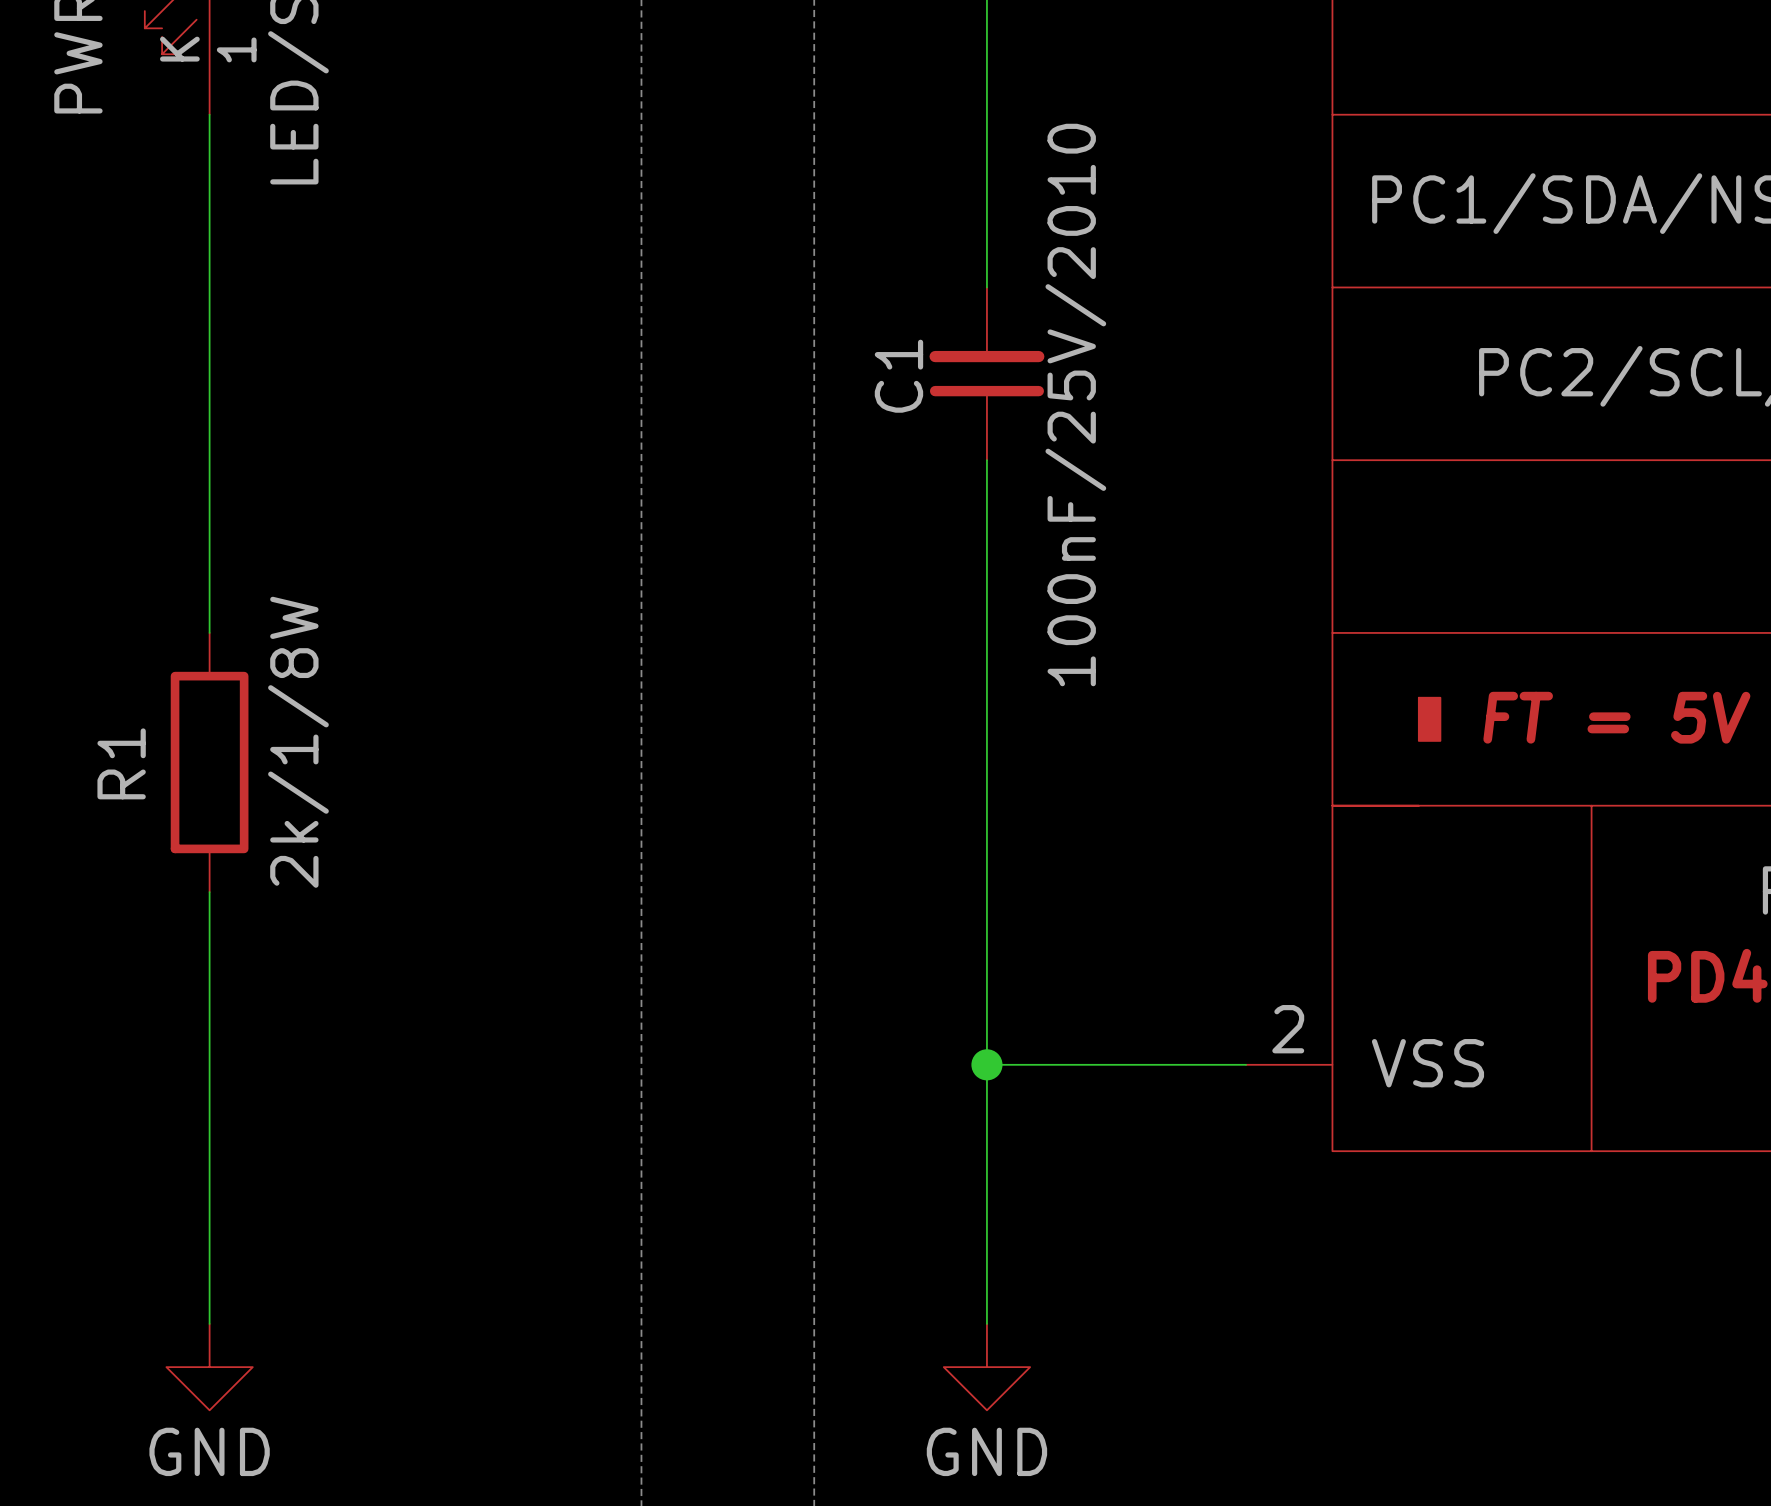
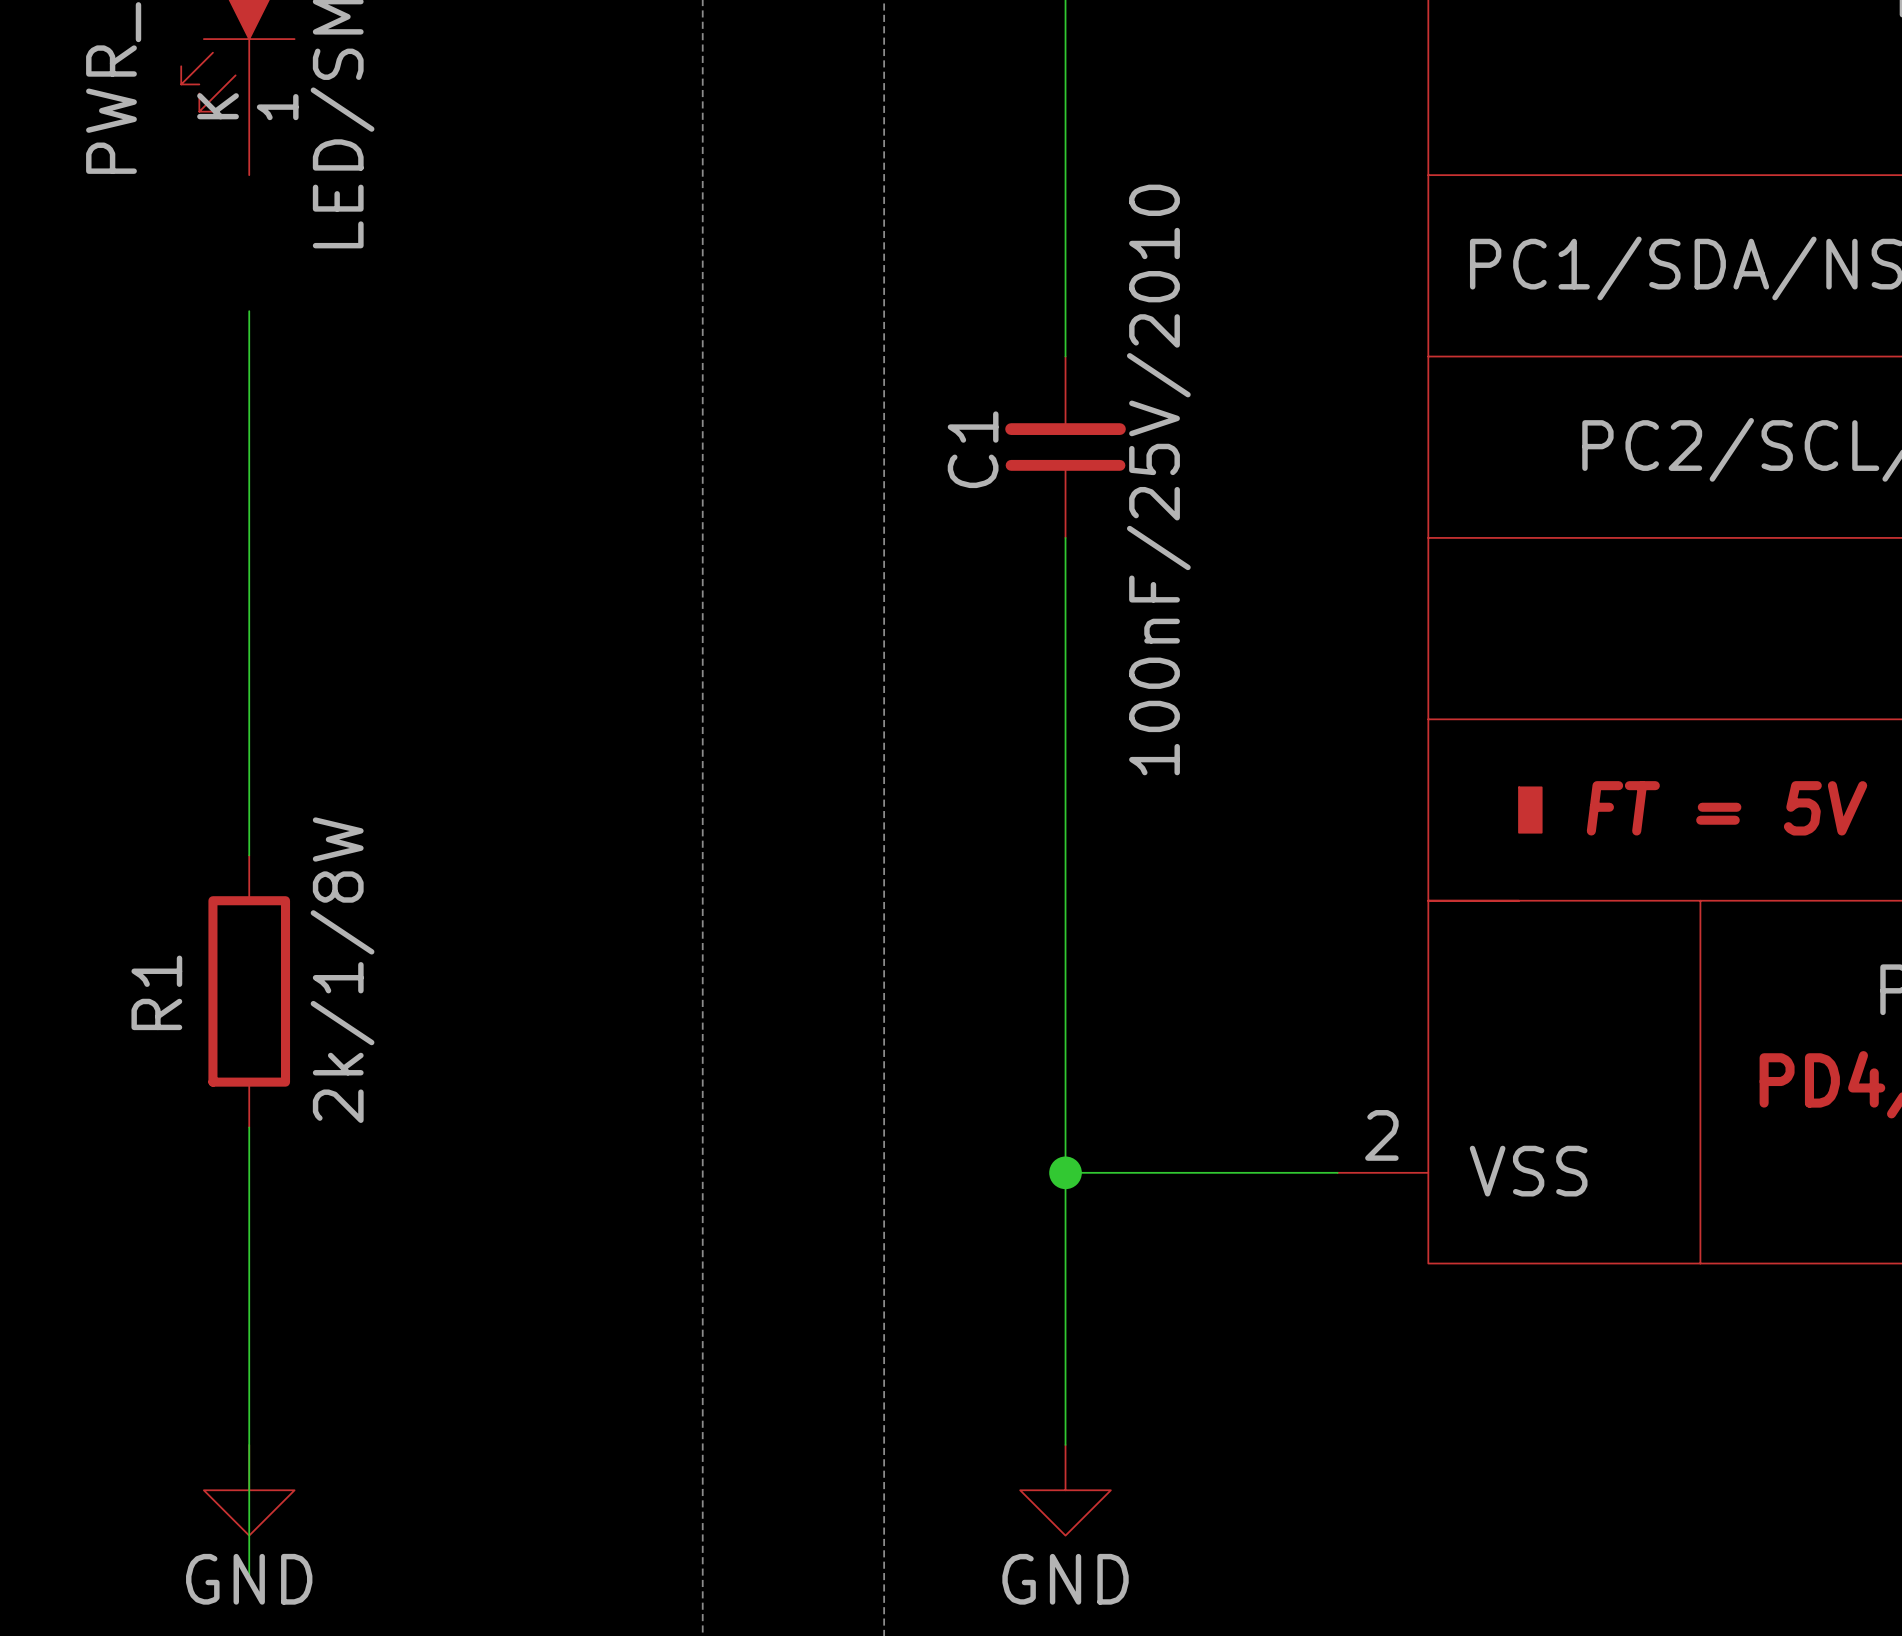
wire: (209, 114) (209, 244) -> none
R1 position: (209, 762) -> (249, 991)
wire: (209, 892) (209, 1021) -> (249, 719) (249, 855)
wire: none -> (249, 1444) (249, 1580)

